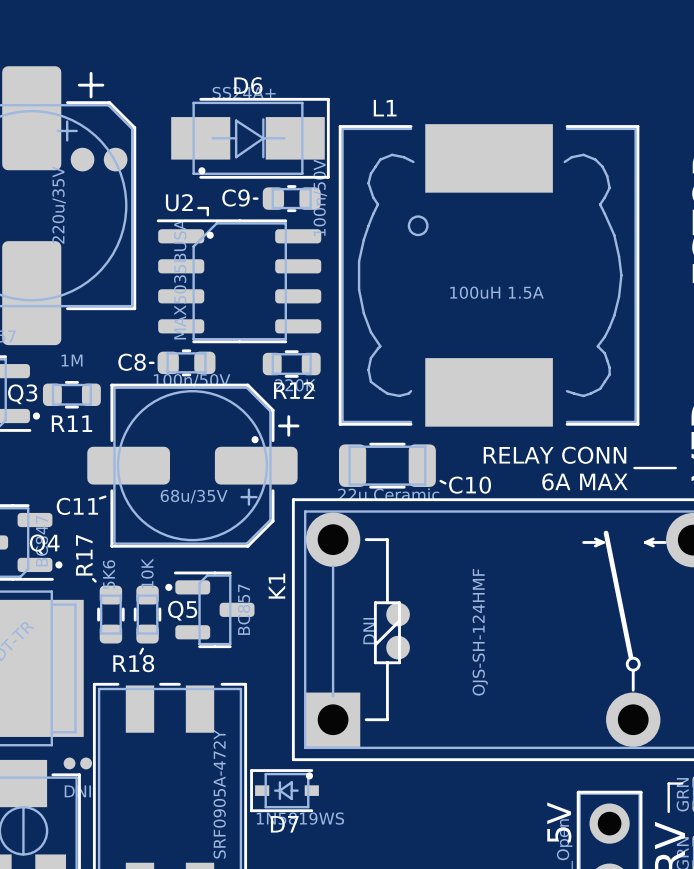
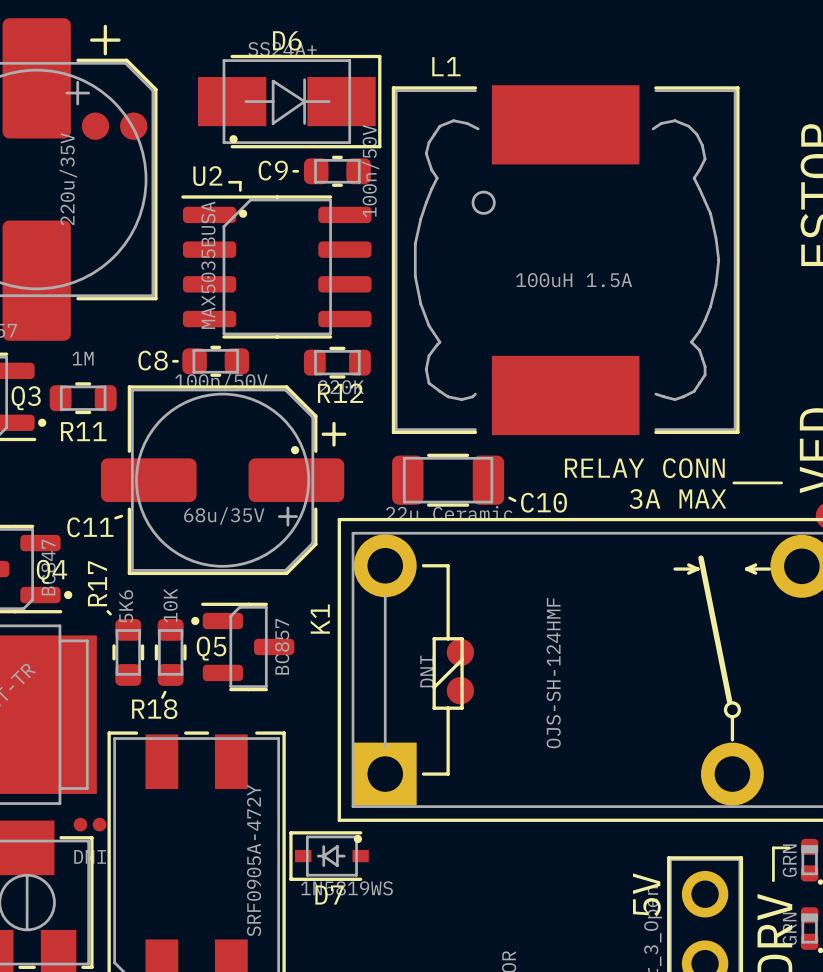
text: 6A MAX (585, 481) -> 3A MAX (677, 498)

